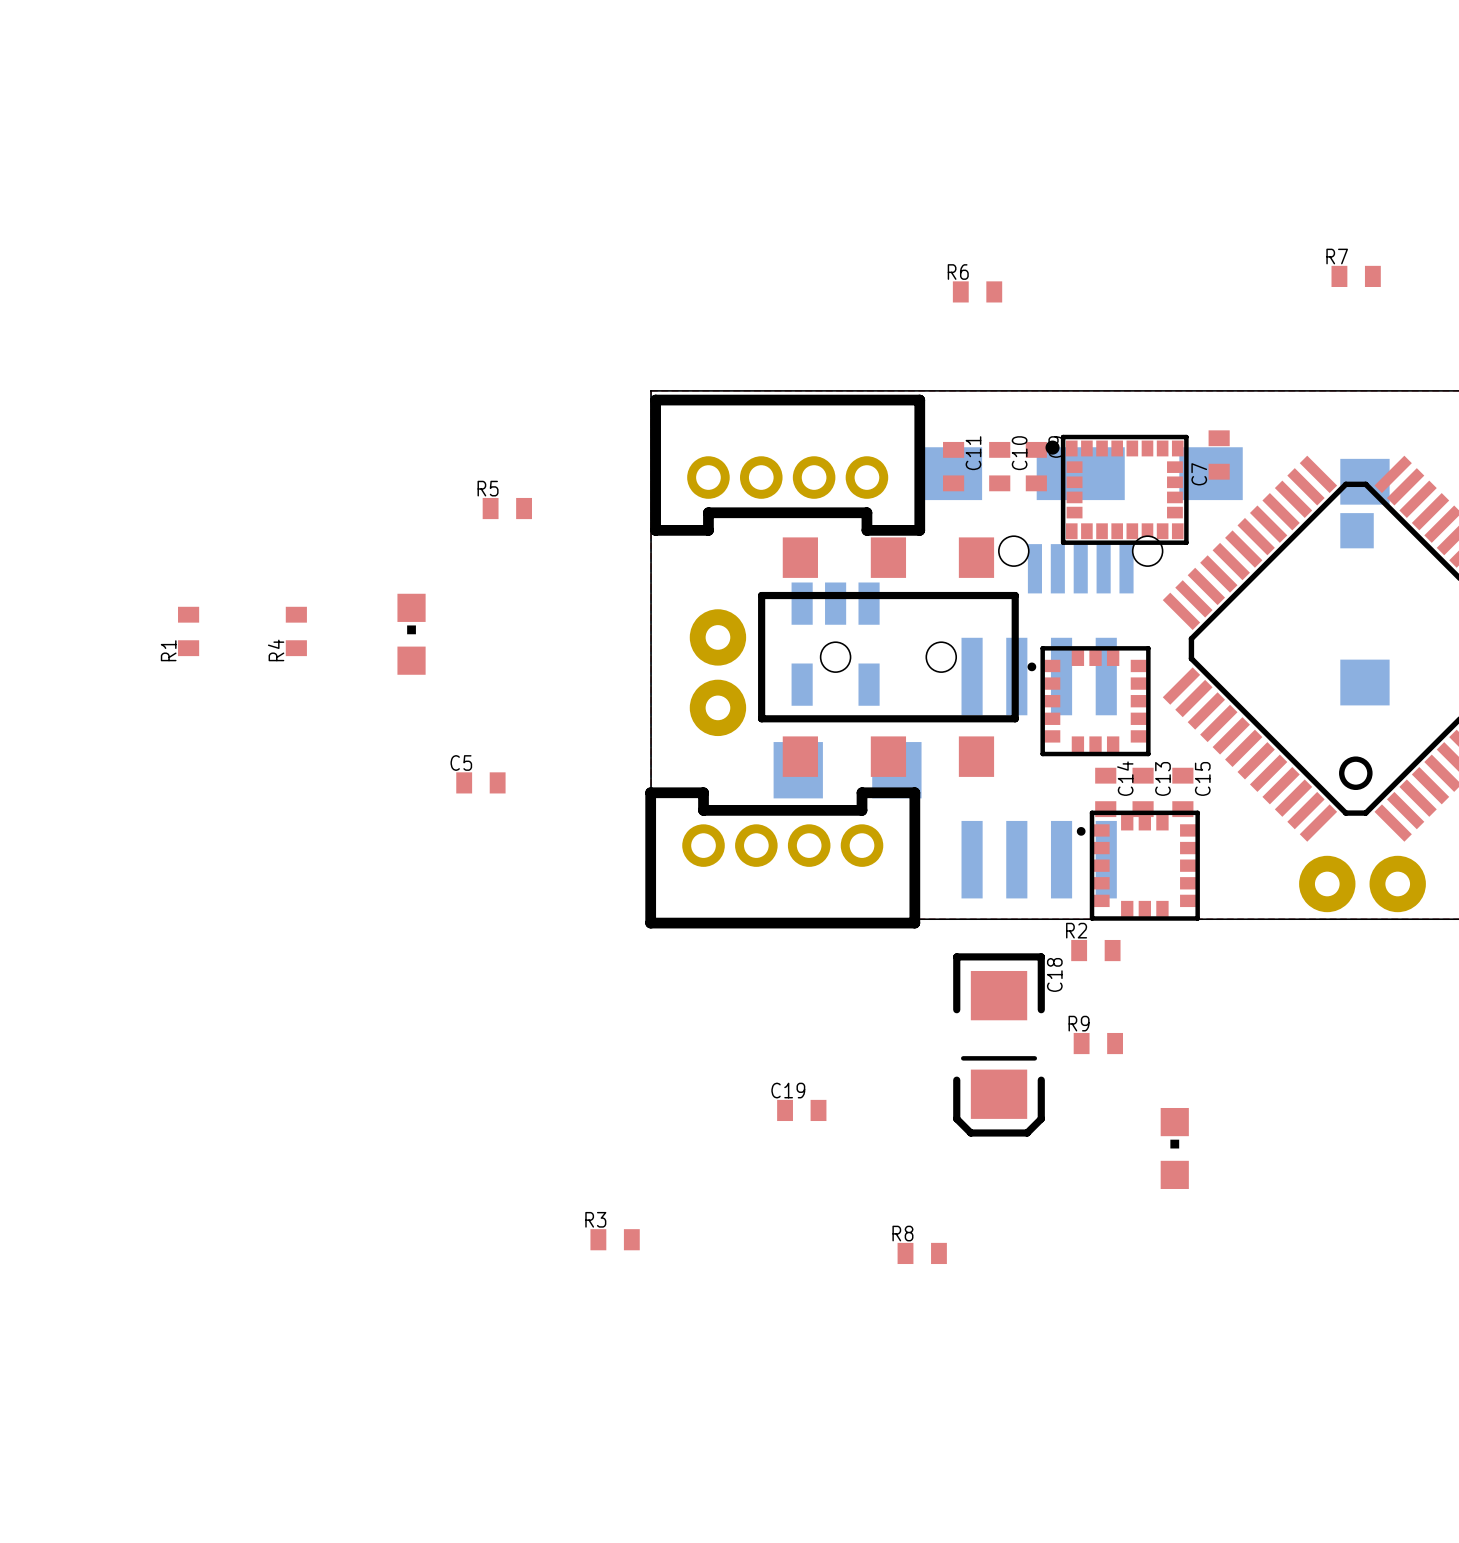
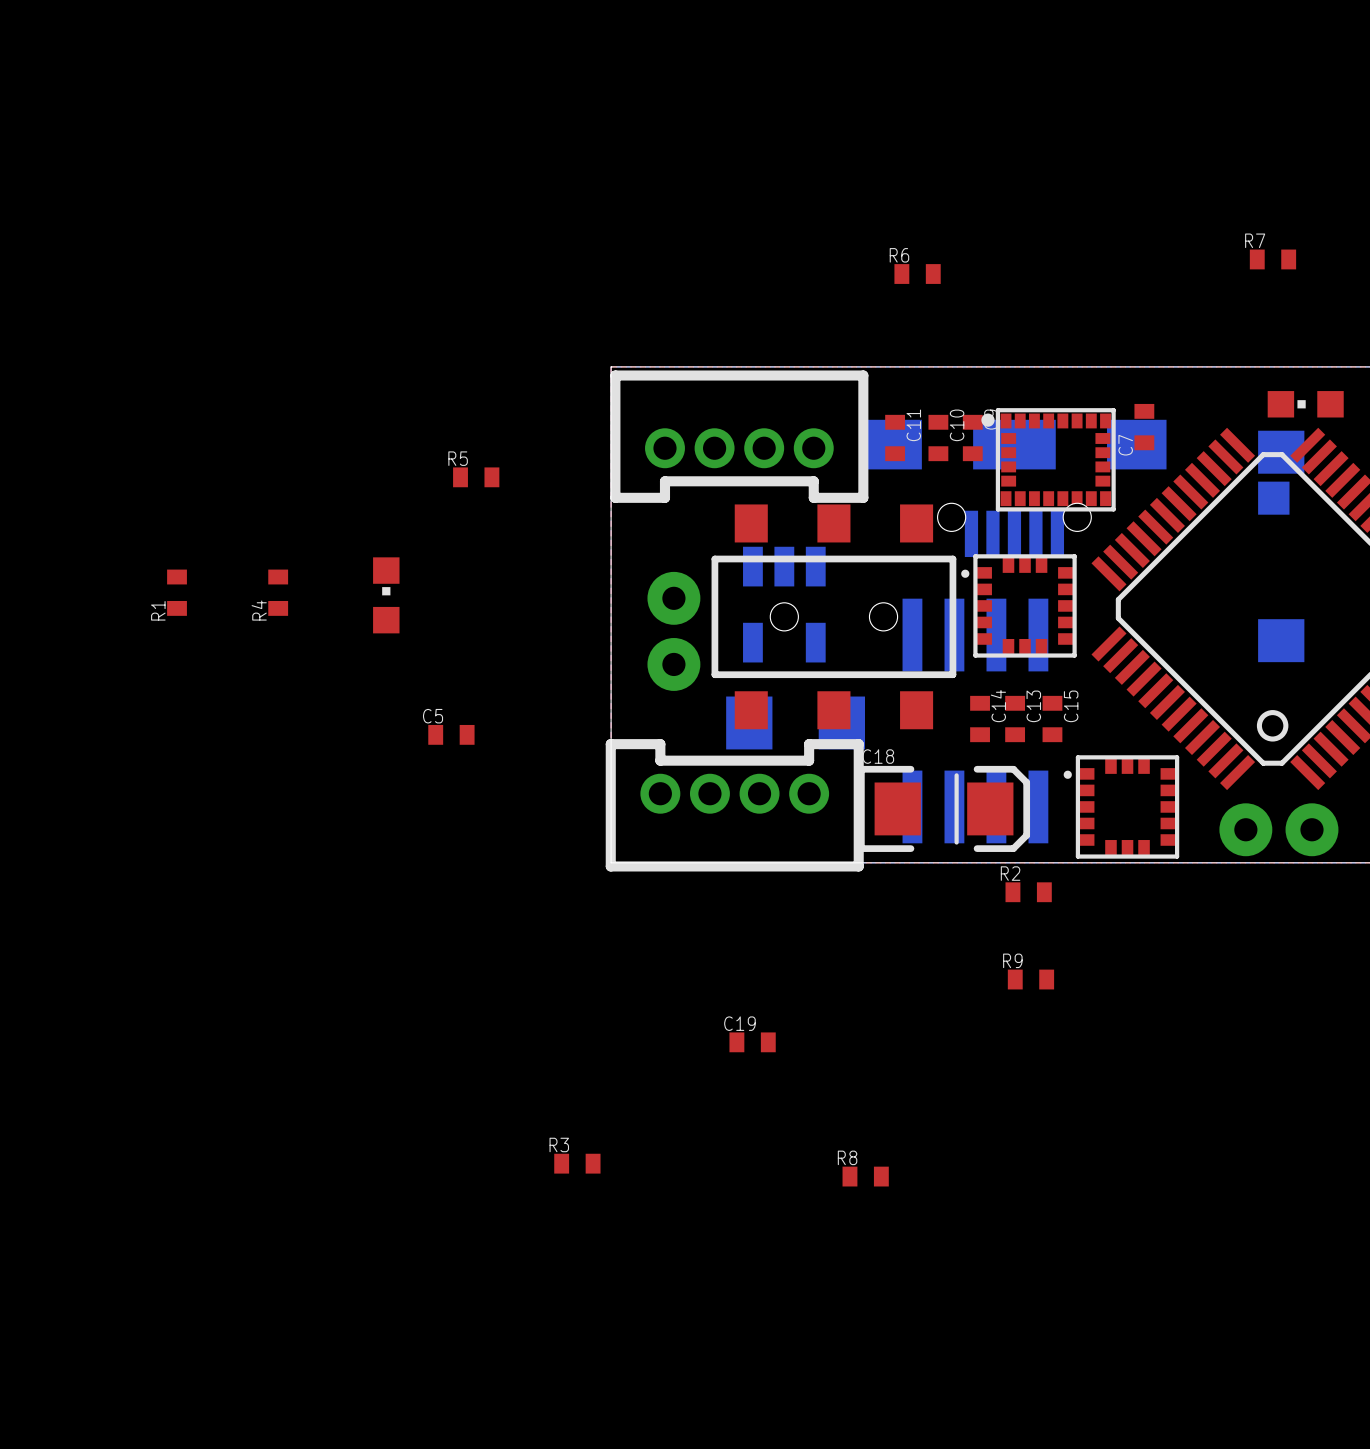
part position: (1089, 701) -> (1018, 605)
C14 position: (1105, 792) -> (980, 719)
C13 position: (1143, 792) -> (1015, 719)
C15 position: (1182, 792) -> (1052, 719)
part position: (1138, 865) -> (1121, 806)
C18 rotation: 0° (999, 1044) -> 90° counterclockwise (944, 808)
C18 position: (999, 1044) -> (944, 808)
part rotation: 0° (1174, 1148) -> 90° counterclockwise (1305, 404)
part position: (1174, 1148) -> (1305, 404)

